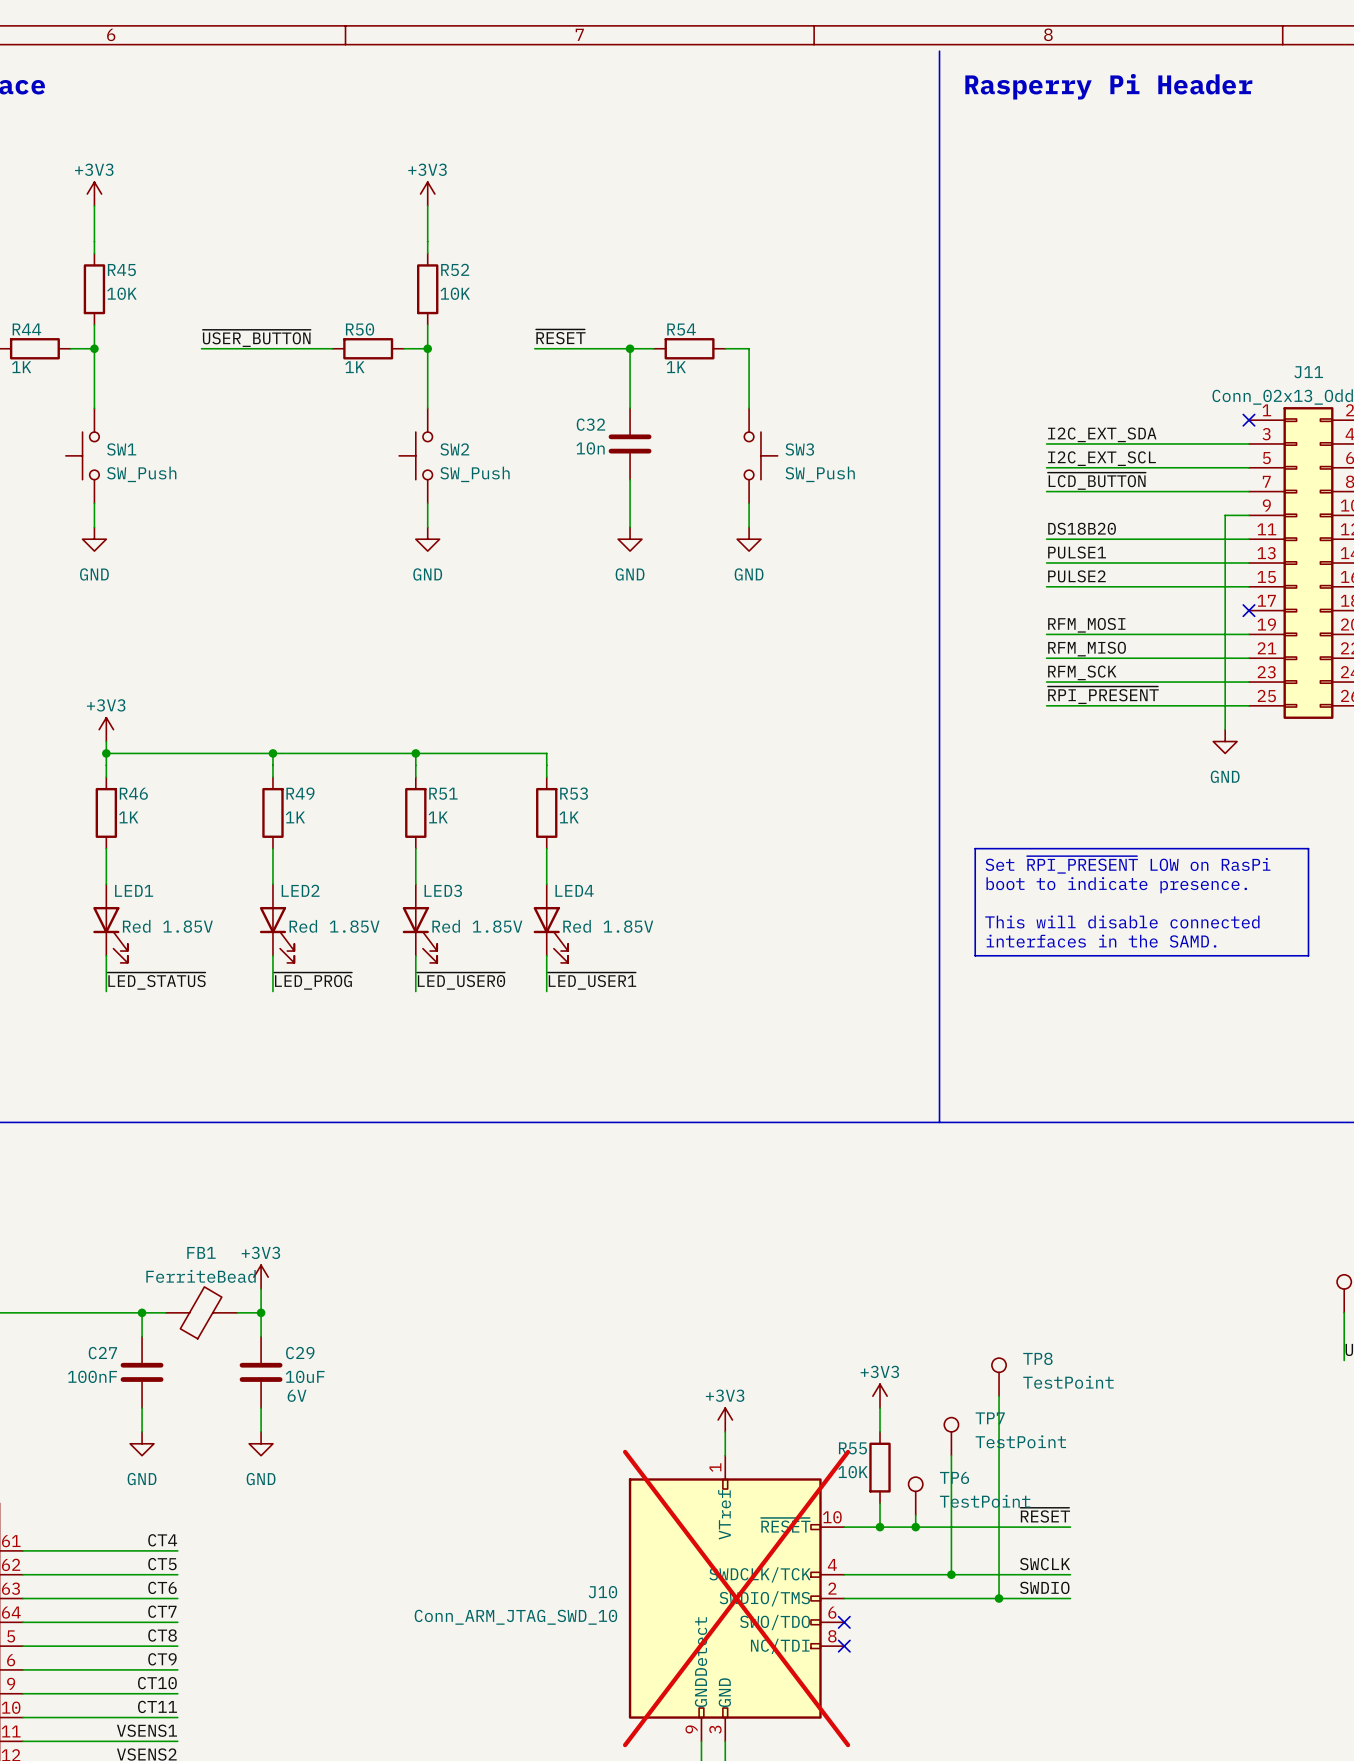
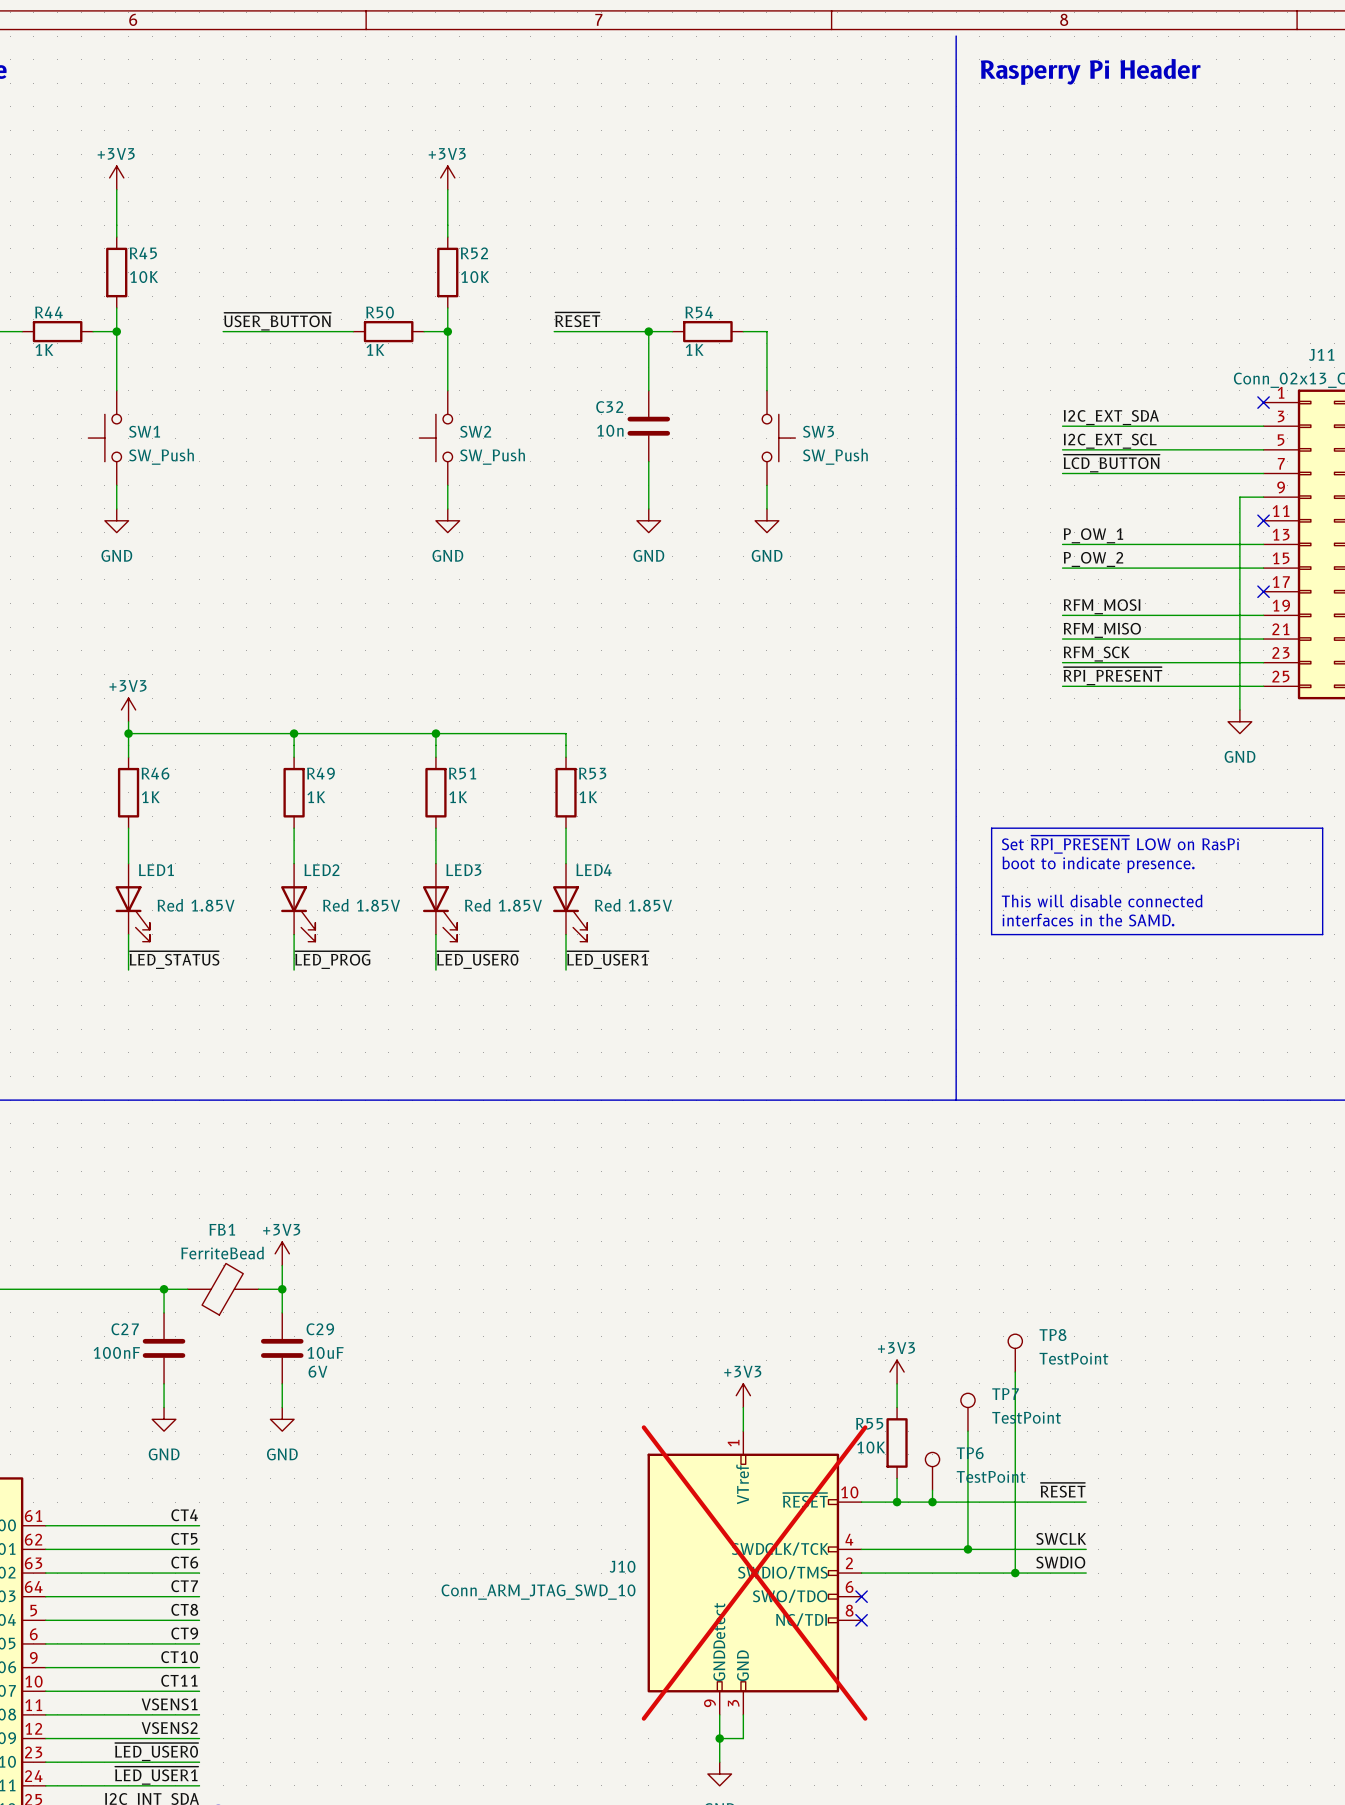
label: DS18B20 (1082, 528) -> none
wire: (1046, 539) (1248, 539) -> none
no-connect mark: none -> (1263, 520)
label: PULSE1 (1077, 552) -> P_OW_1 (1093, 535)
label: PULSE2 (1076, 576) -> P_OW_2 (1093, 559)

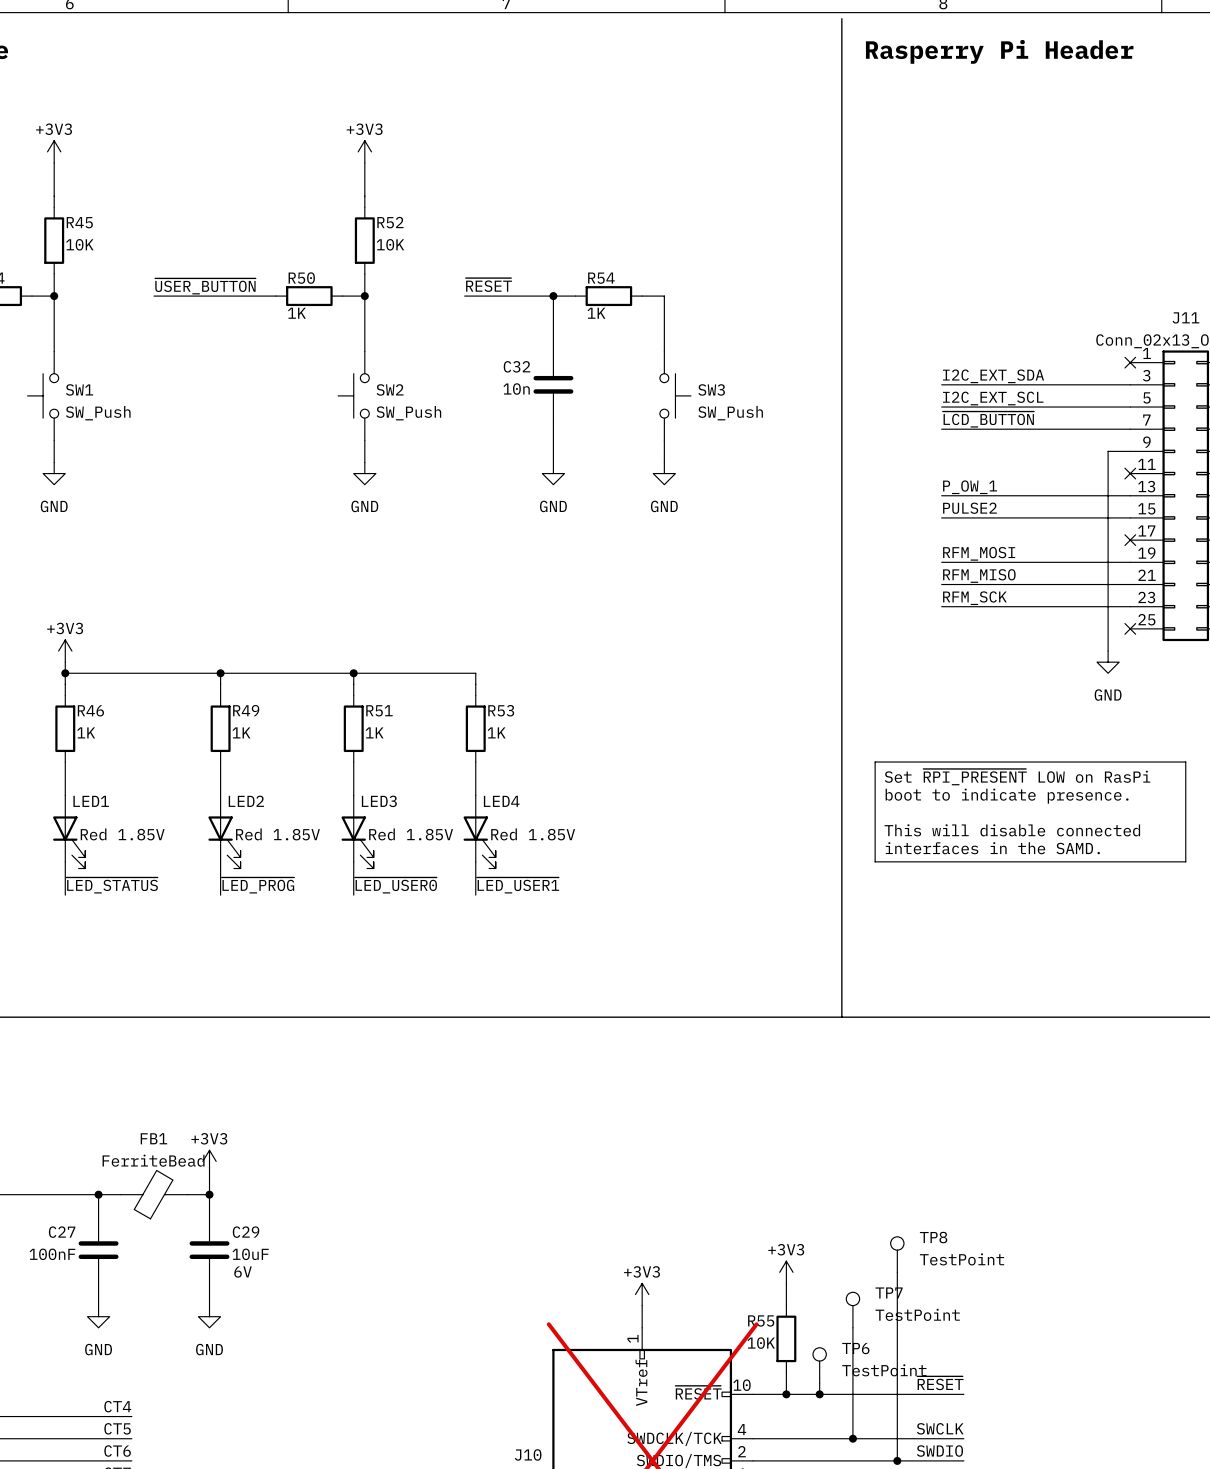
label: P_OW_2 (1093, 559) -> PULSE2 (969, 508)
label: ~{RPI_PRESENT} (1112, 676) -> none
wire: (1062, 686) (1263, 686) -> none
no-connect mark: none -> (1130, 628)

